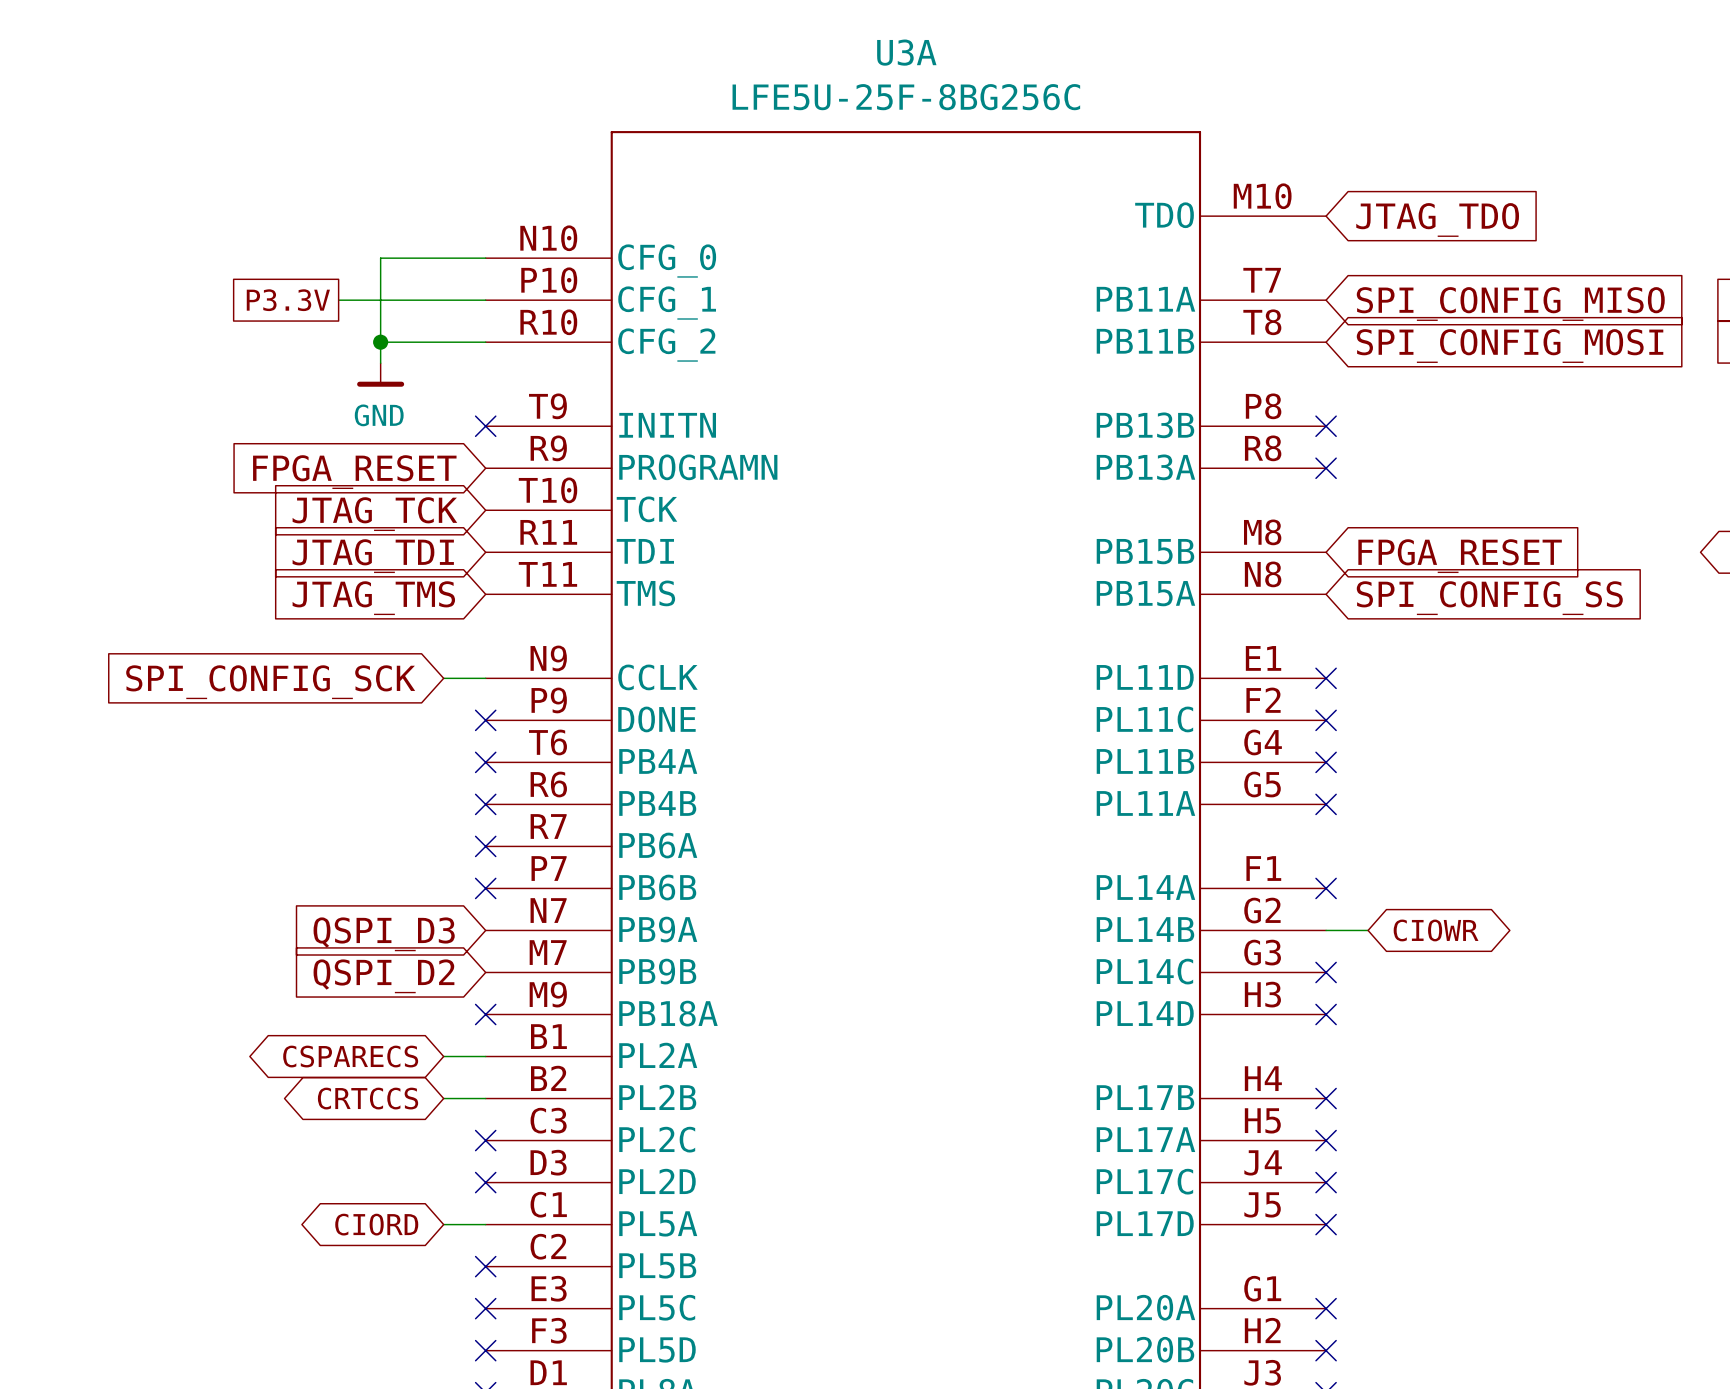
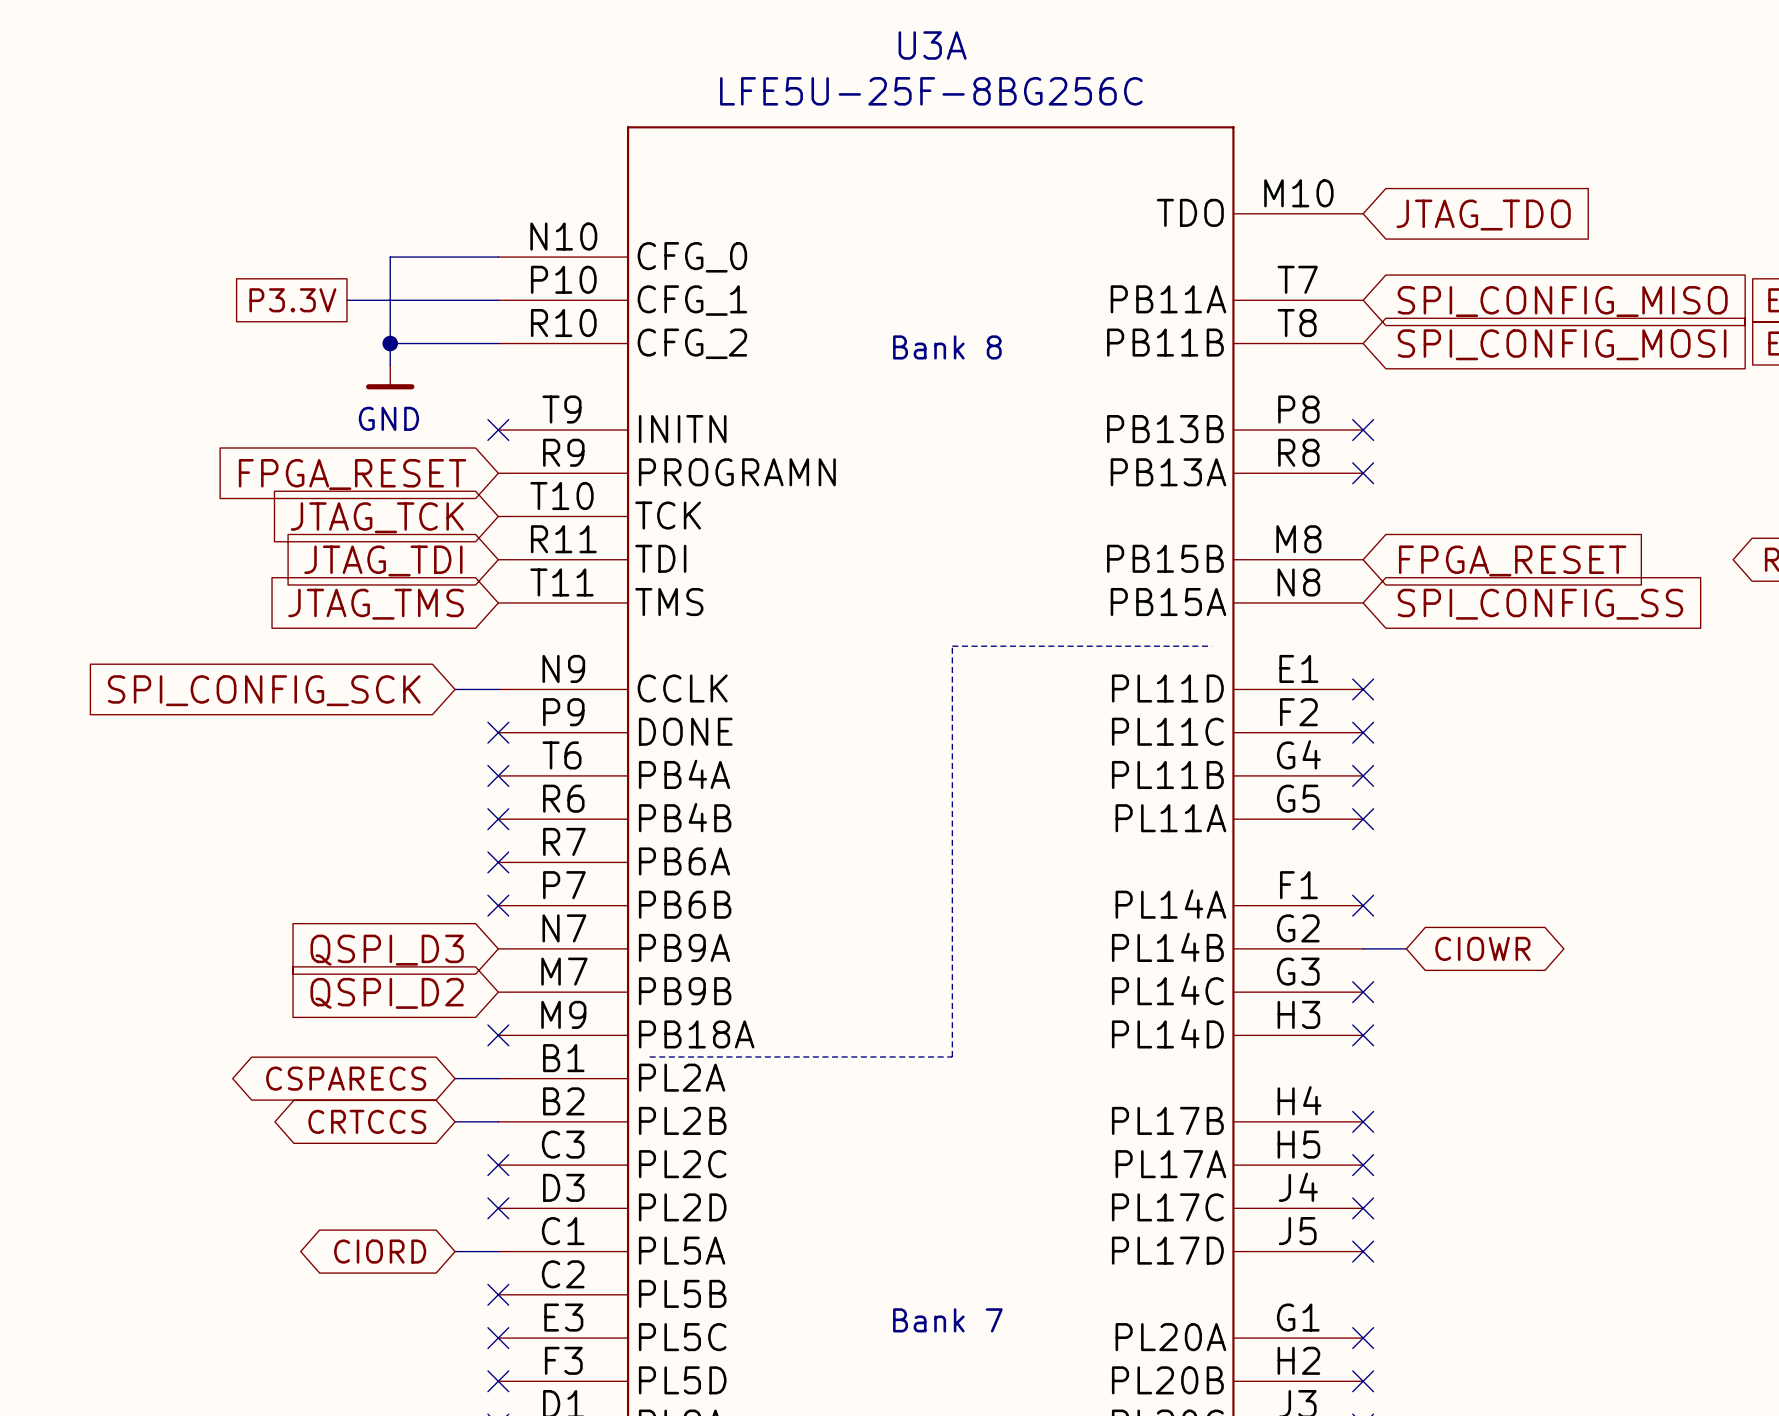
text: none -> Bank 8 (947, 347)
line: none -> (1211, 646) (952, 646) (952, 1057) (649, 1057)
text: none -> Bank 7 (947, 1320)

